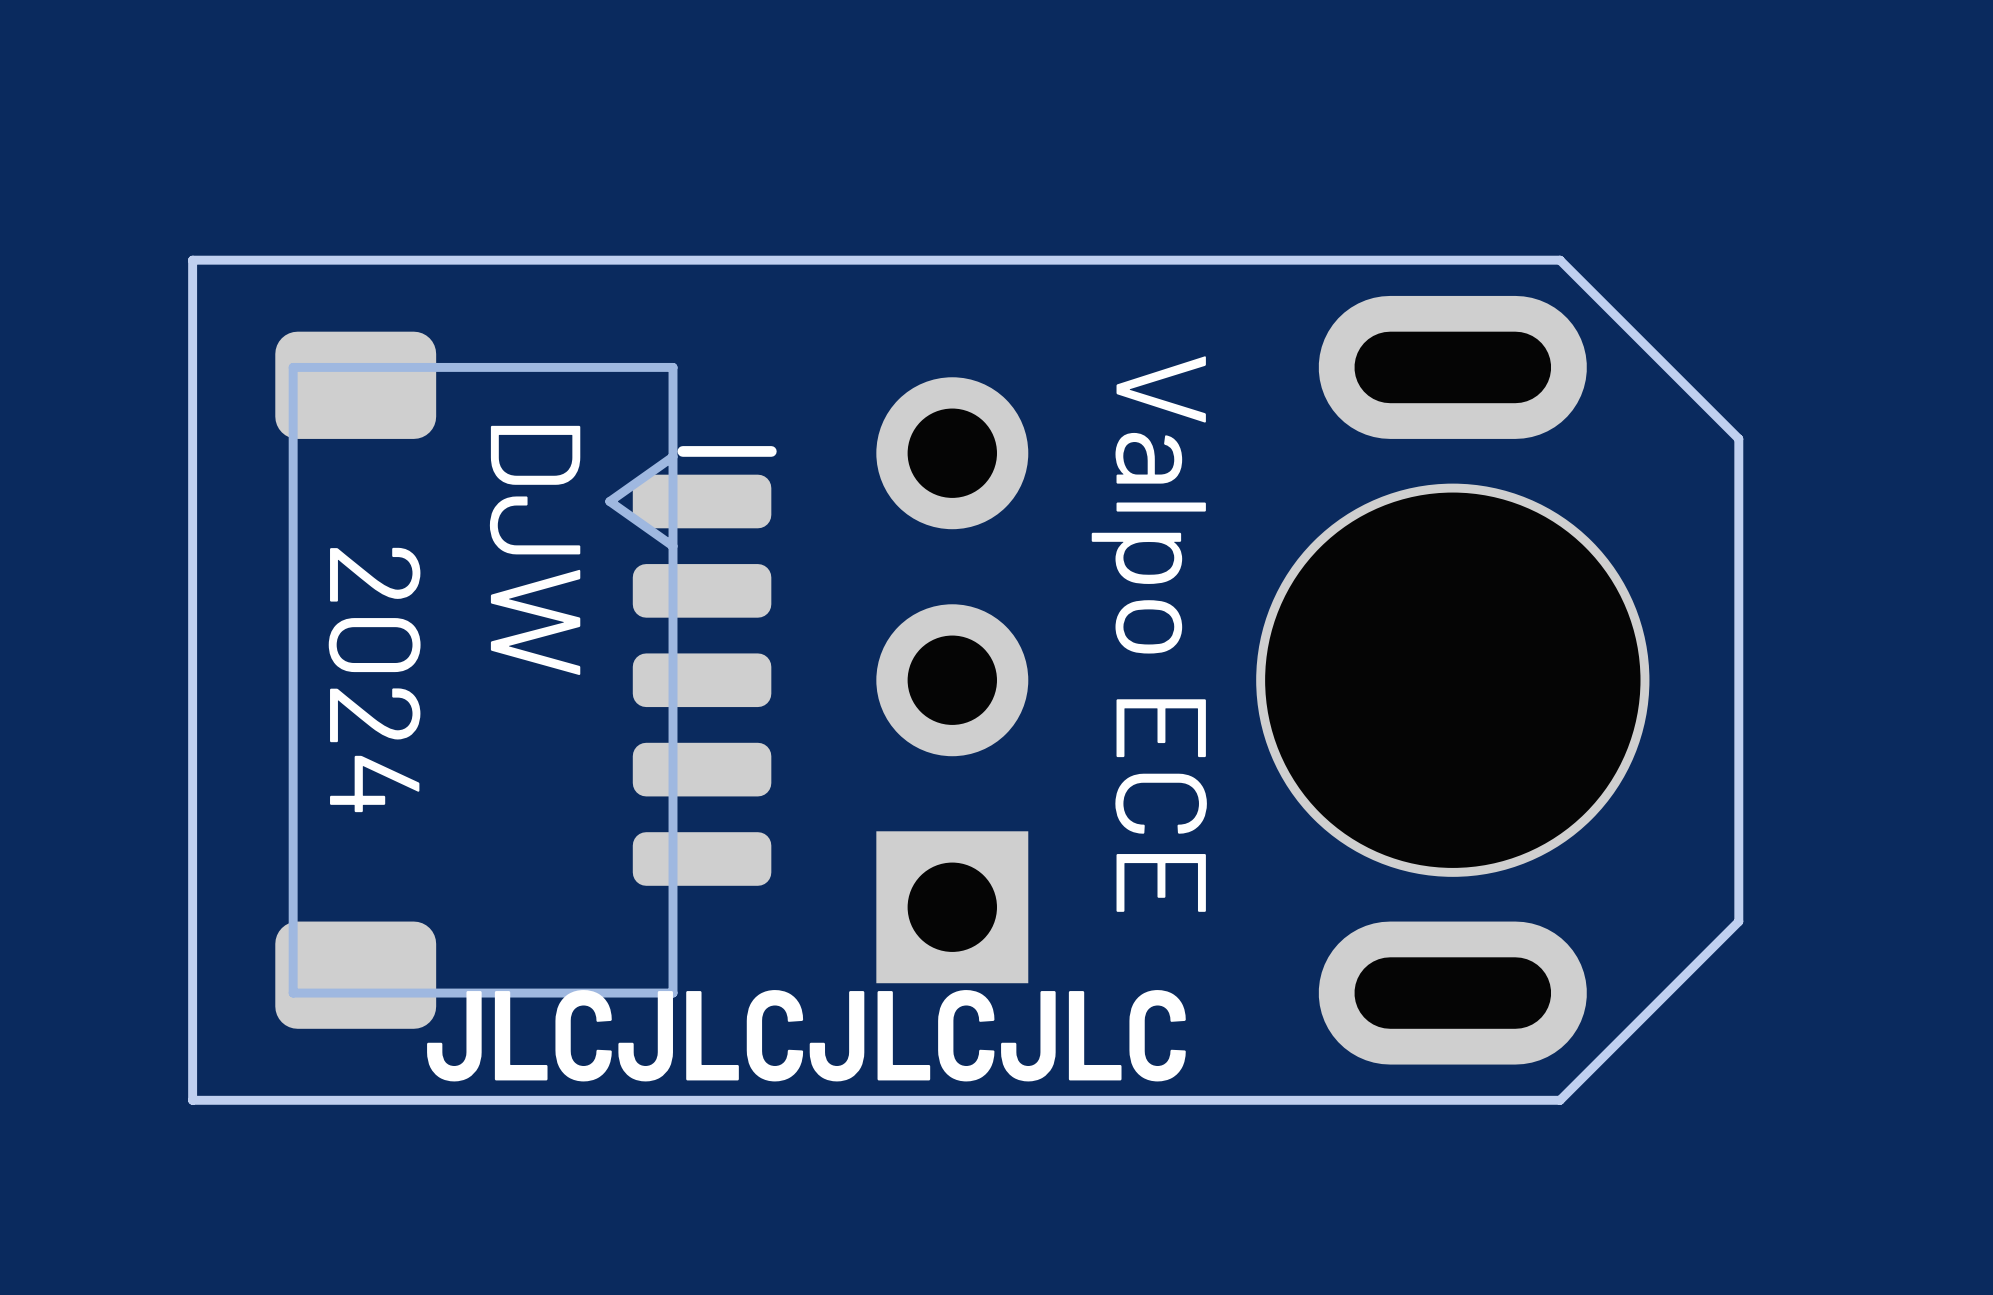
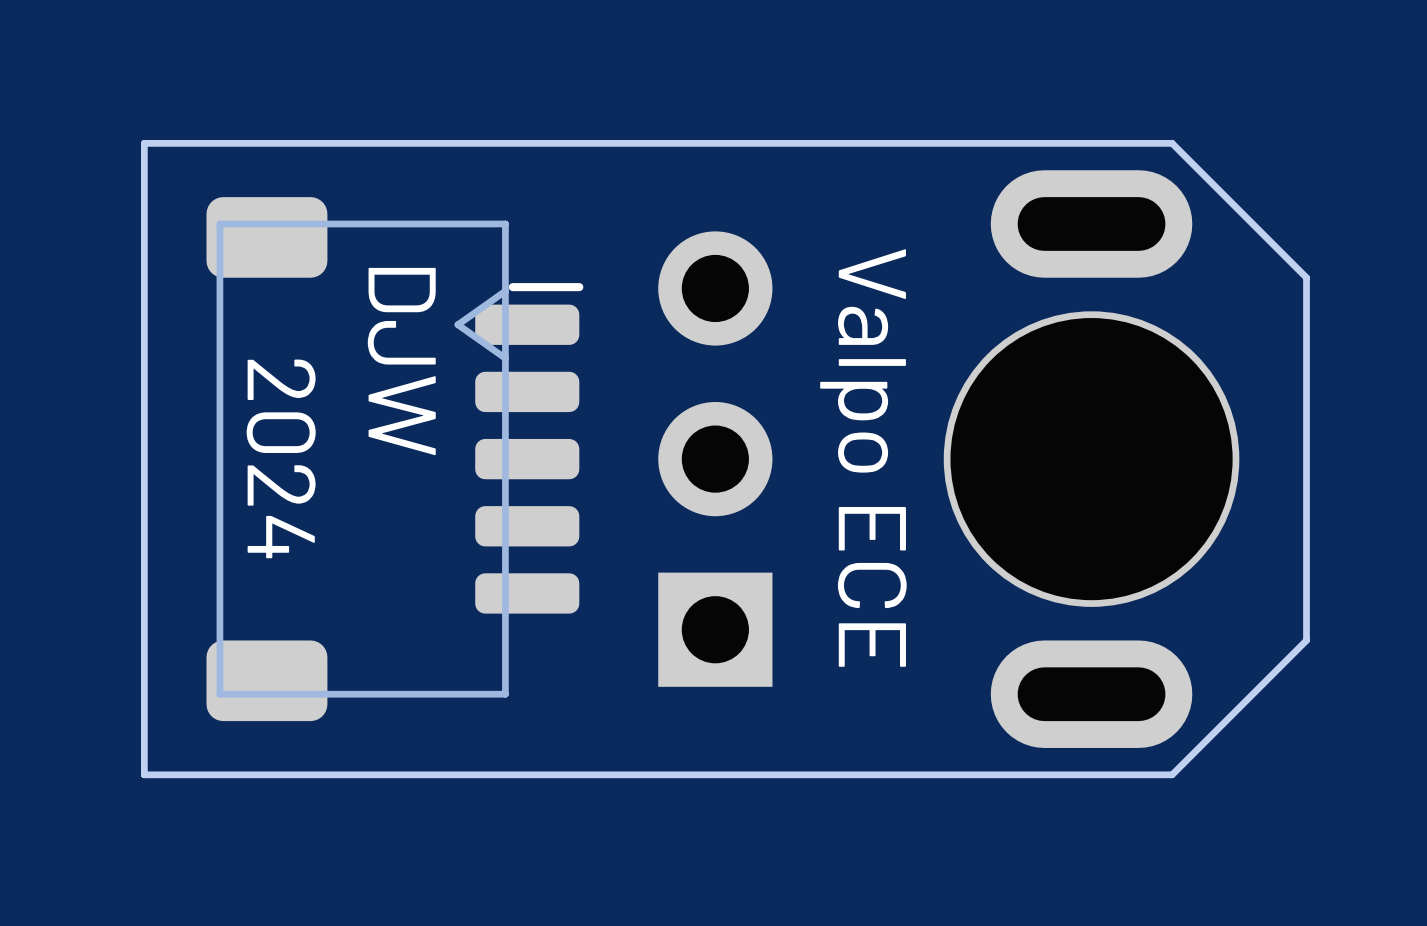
text position: Valpo ECE (1149, 634) -> Valpo ECE (863, 458)
text: JLCJLCJLCJLC (806, 1035) -> none

